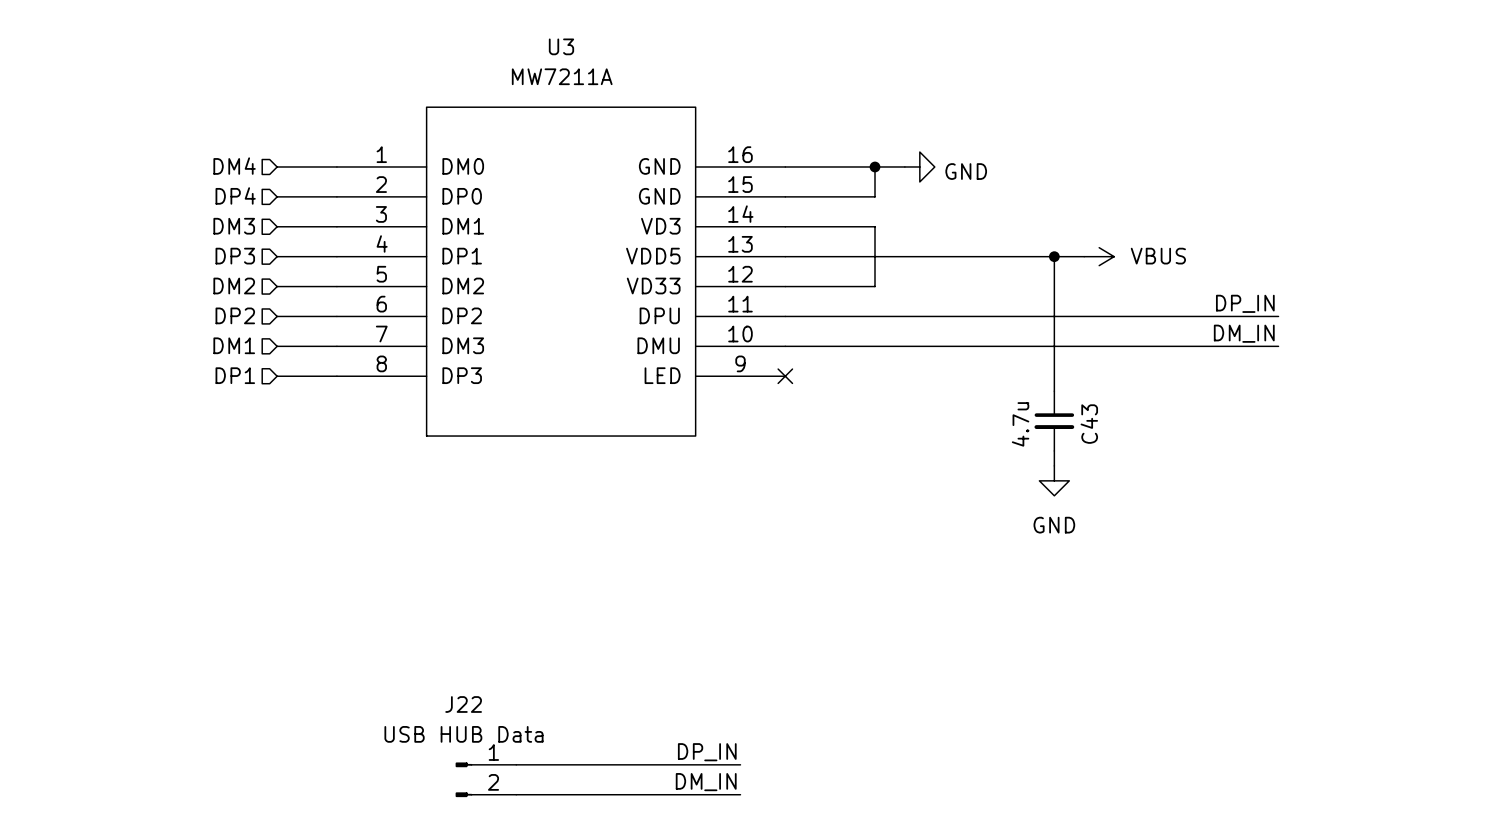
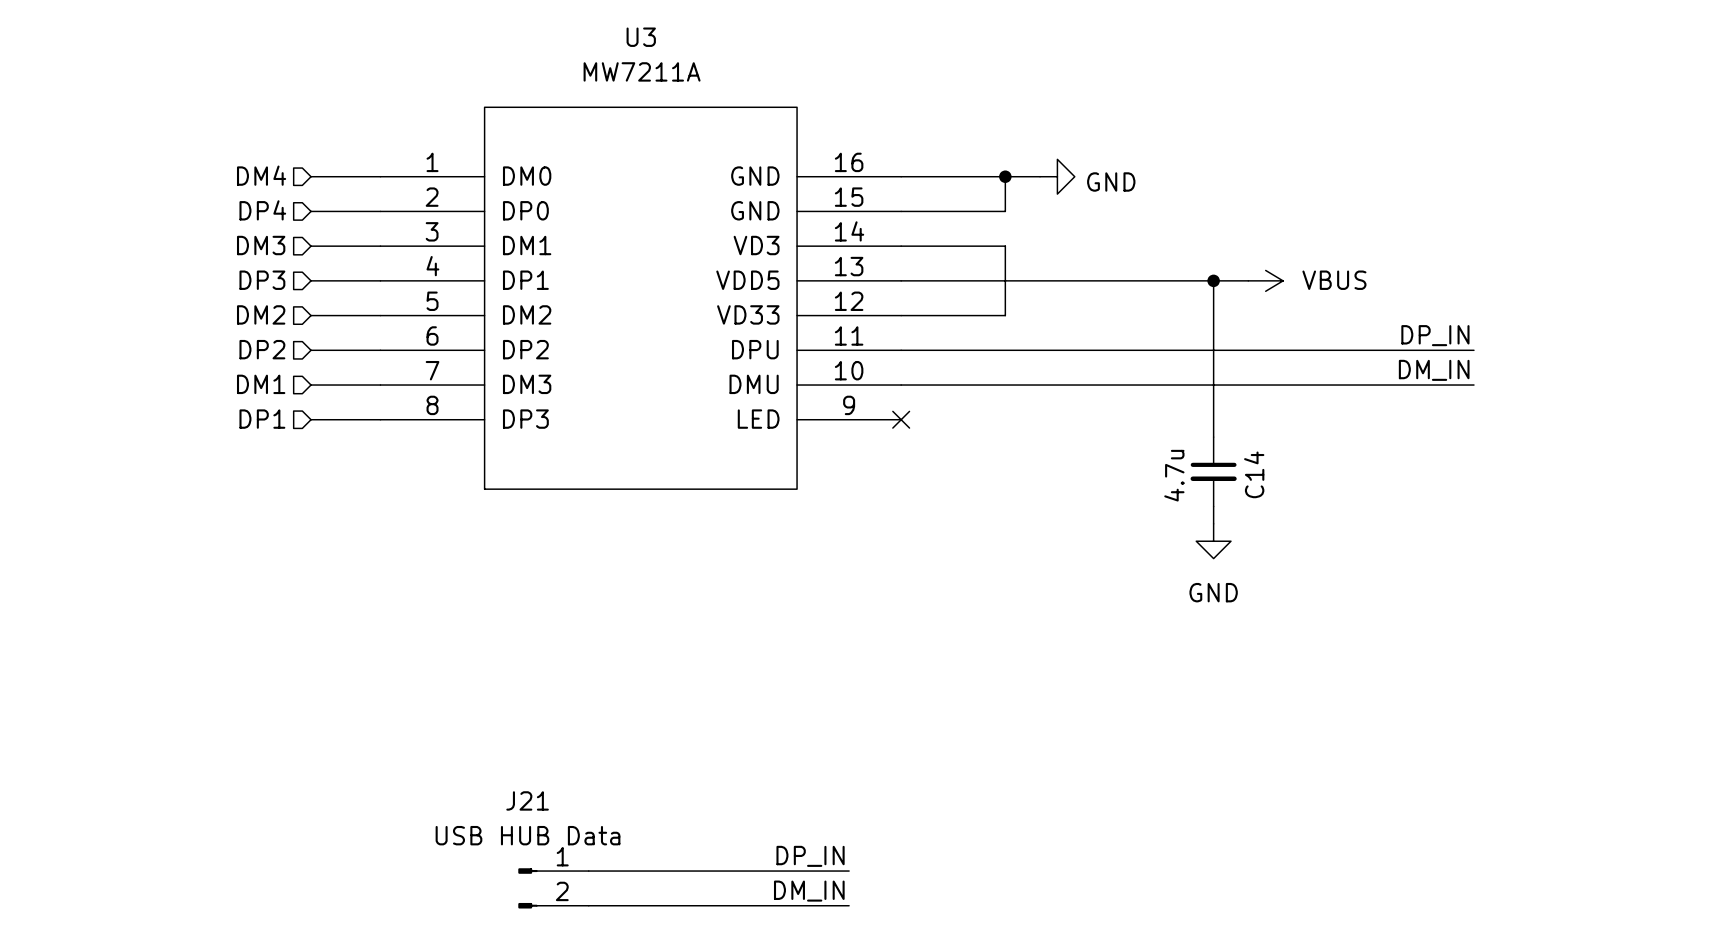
C43 name: C43 (1089, 424) -> C14 (1254, 474)
J22 name: J22 (463, 704) -> J21 (527, 800)

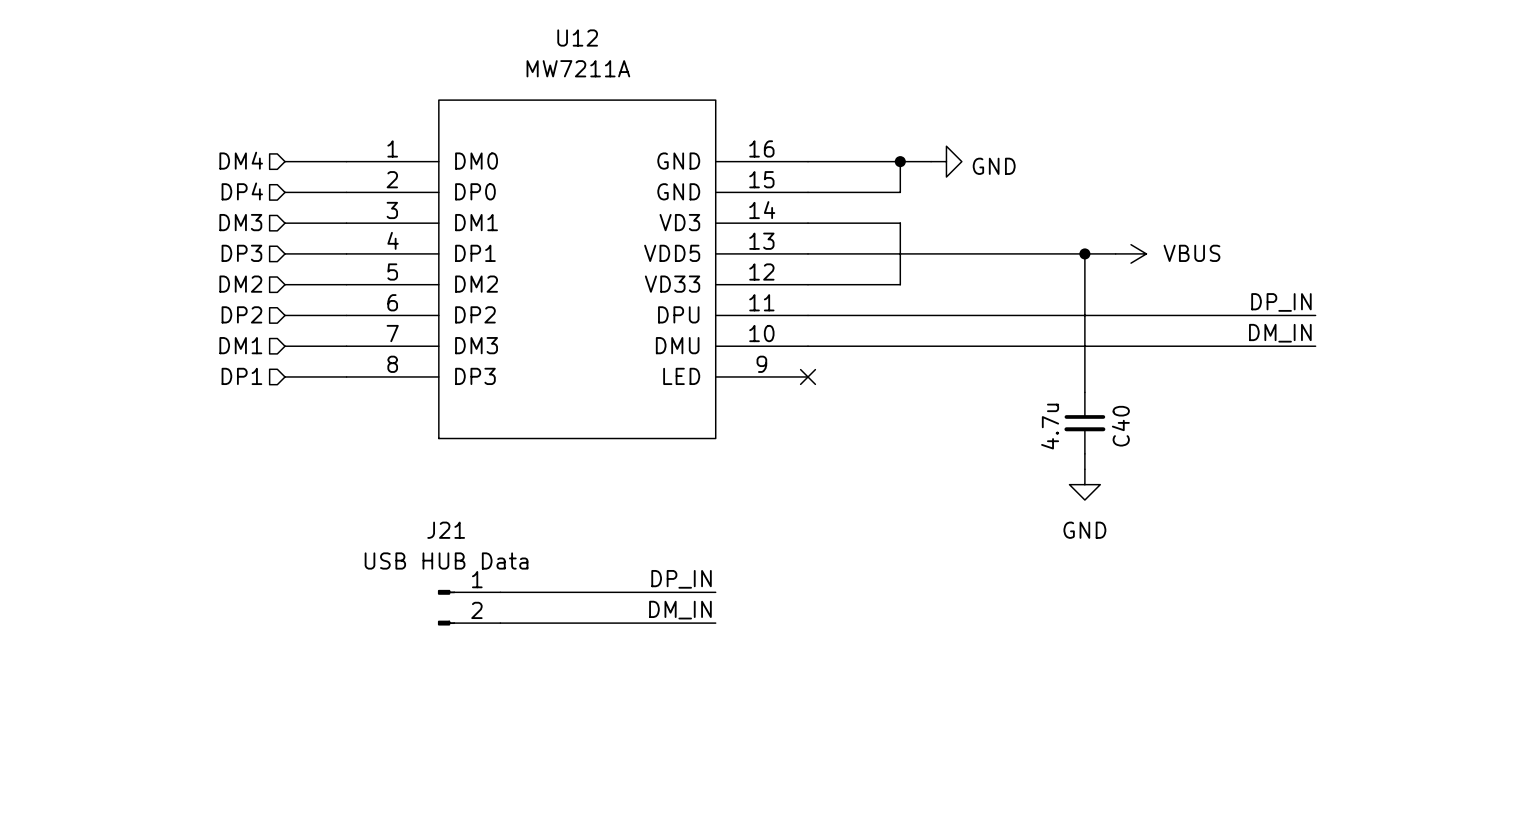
U3 name: U3 (641, 37) -> U12 (577, 38)
C14 name: C14 (1254, 474) -> C40 (1120, 426)
wire: none -> (500, 592) (715, 592)
wire: none -> (500, 623) (715, 623)
label position: DP_IN (810, 856) -> DP_IN (681, 579)
wire: (588, 871) (849, 871) -> none
J21 position: (553, 888) -> (469, 607)
label position: DM_IN (809, 891) -> DM_IN (680, 610)
wire: (588, 905) (849, 905) -> none

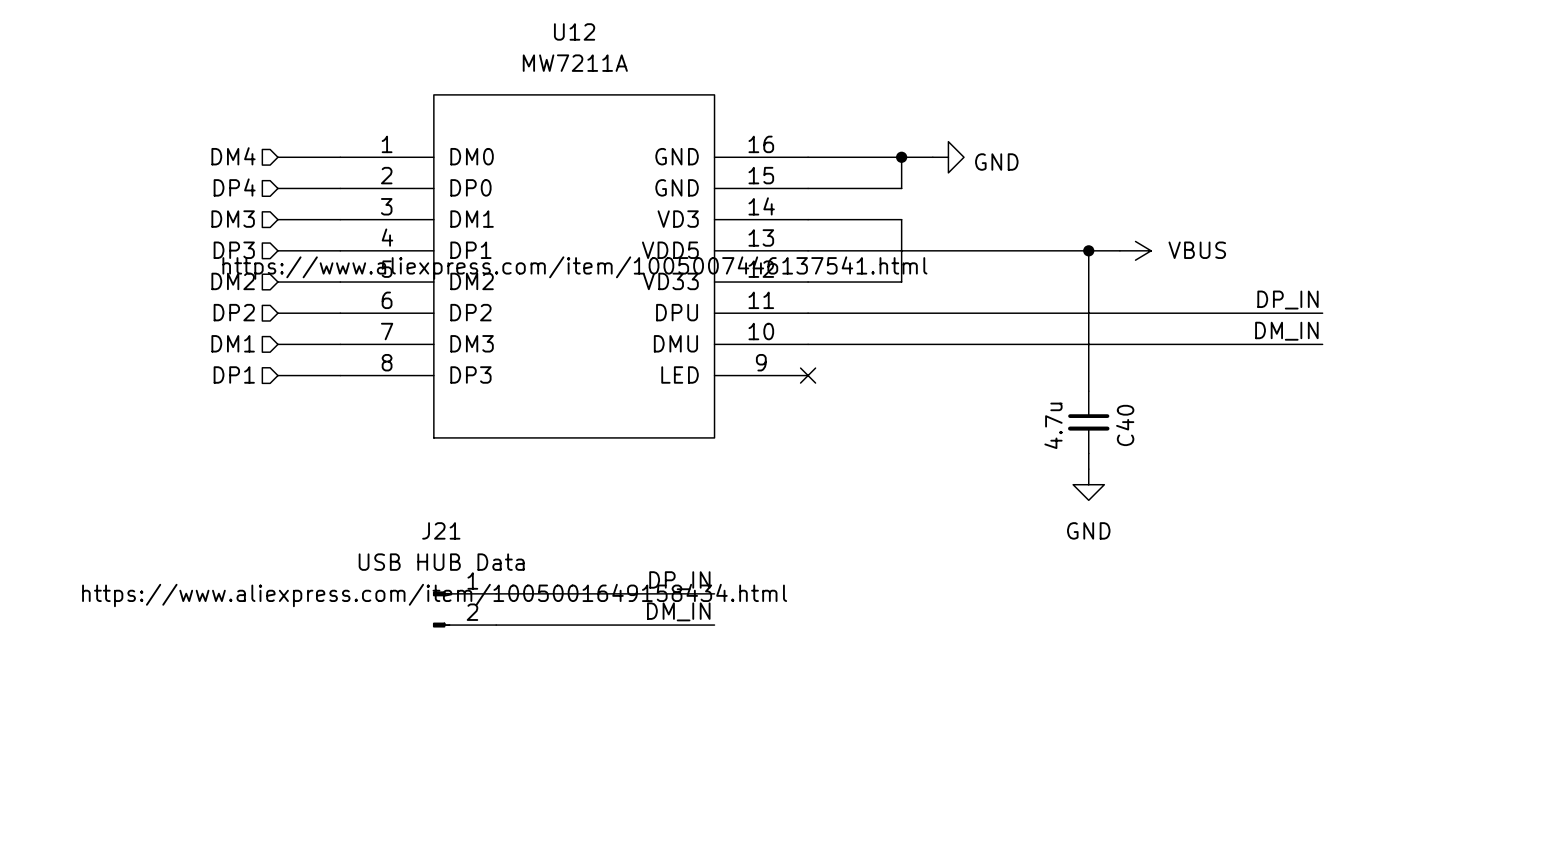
U12 text: none -> https://www.aliexpress.com/item/1005007446137541.html (574, 268)
J21 text: none -> https://www.aliexpress.com/item/1005001649158434.html (434, 595)

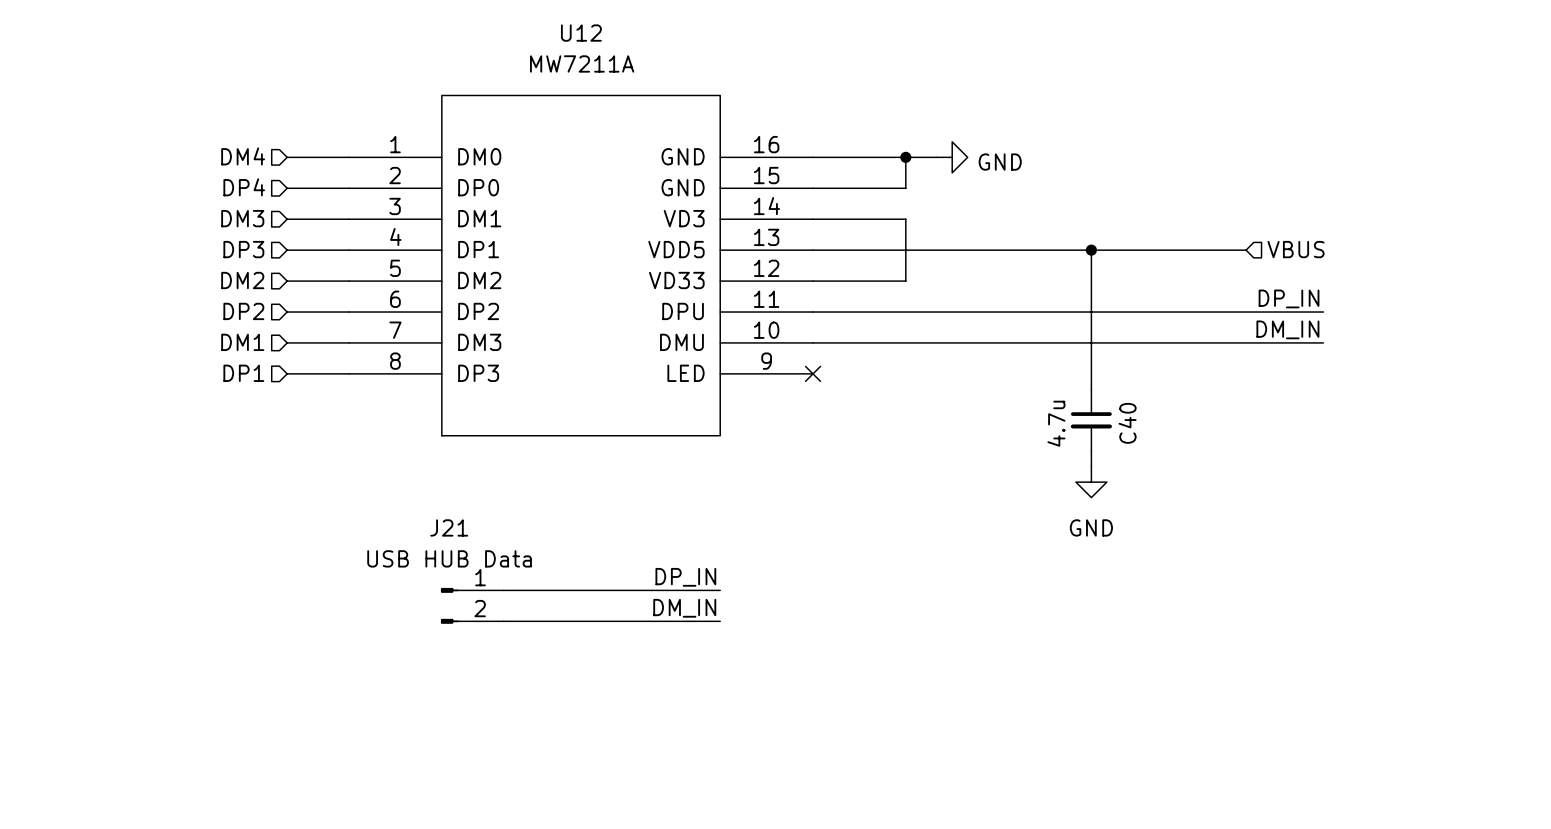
wire: none -> (1122, 250) (1246, 250)
power symbol: VBUS (1135, 250) -> none
hierarchical label: none -> VBUS (1296, 249)
U12 text: https://www.aliexpress.com/item/1005007446137541.html (574, 268) -> none
J21 text: https://www.aliexpress.com/item/1005001649158434.html (434, 595) -> none

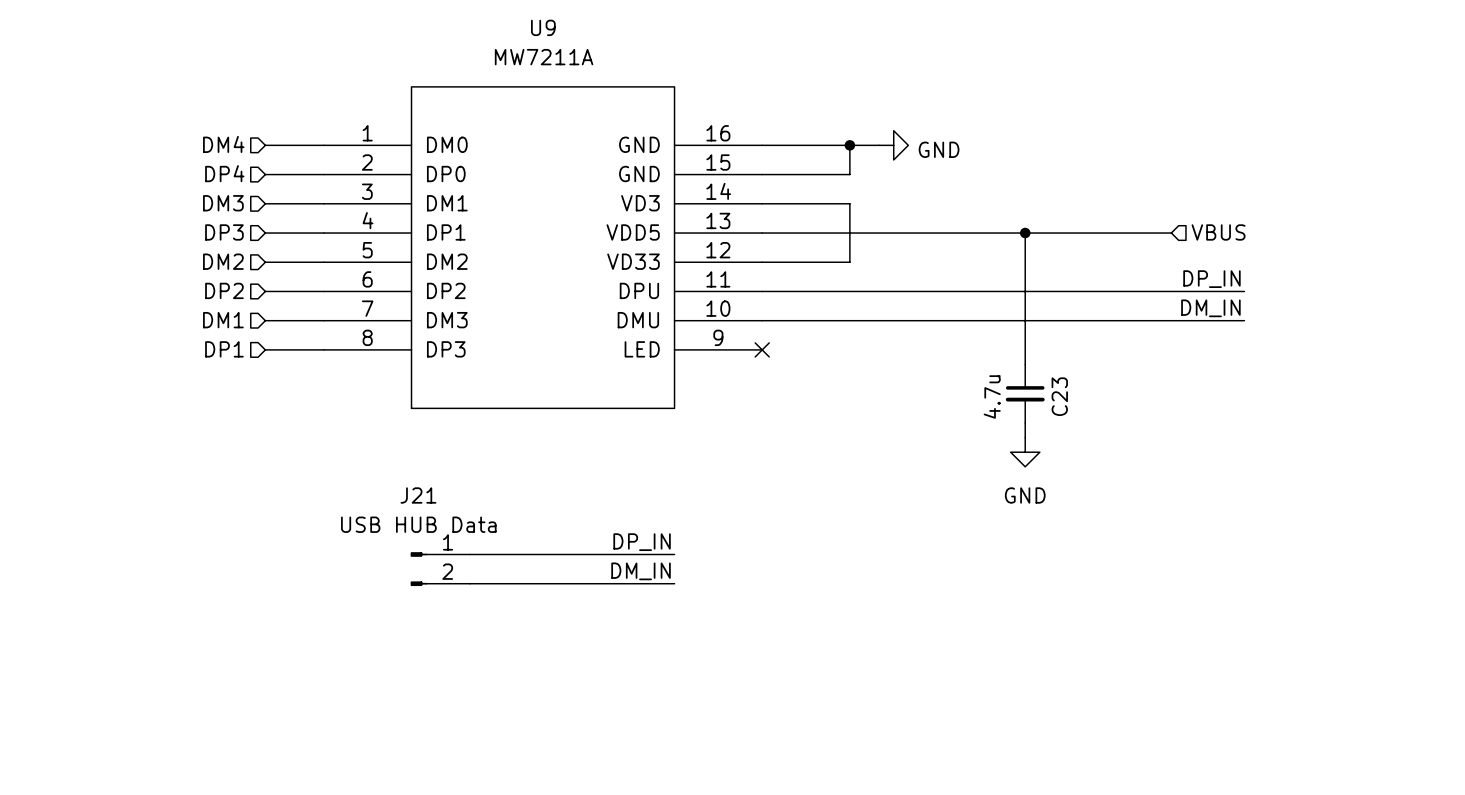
U12 name: U12 (581, 33) -> U9 (543, 27)
C40 name: C40 (1127, 423) -> C23 (1059, 396)

